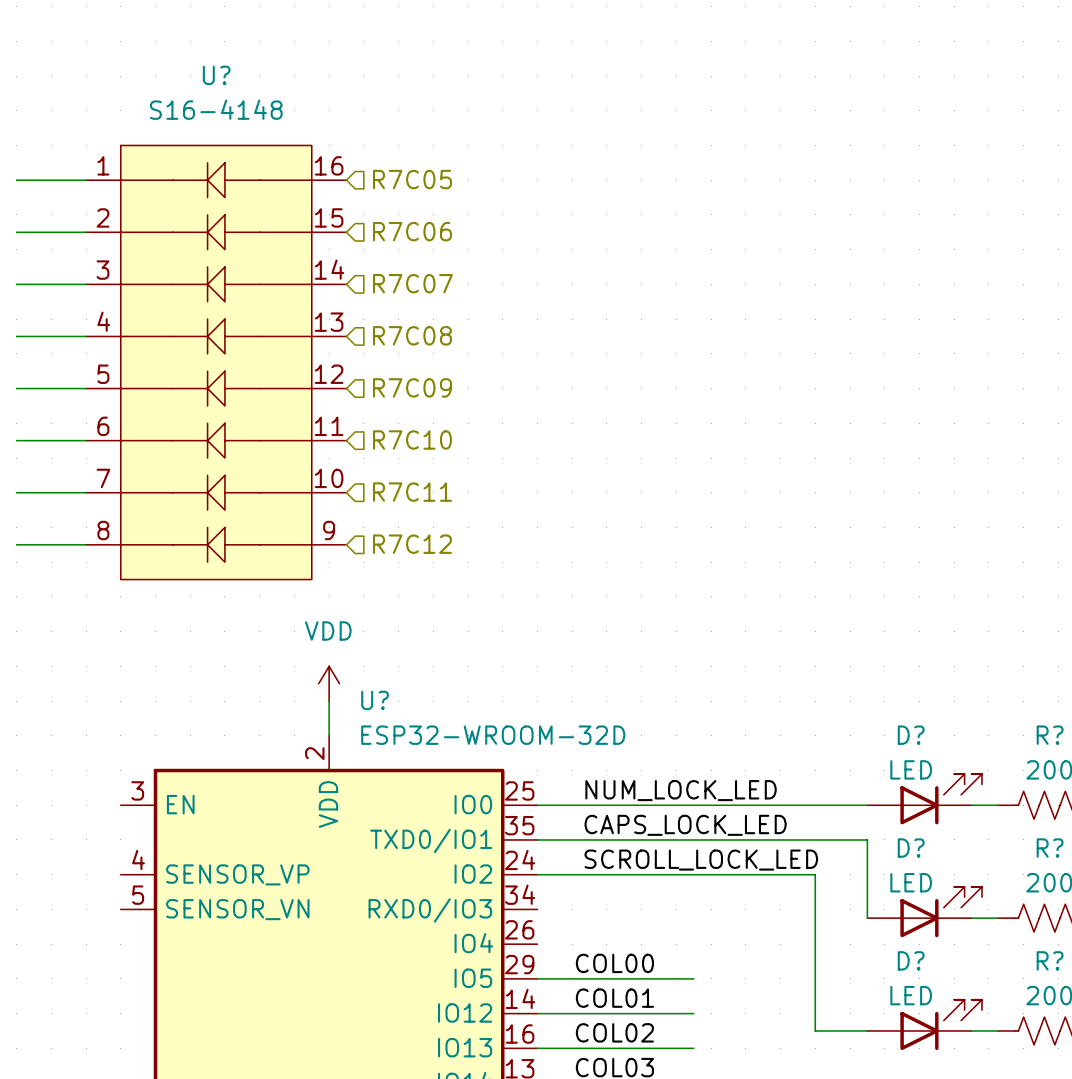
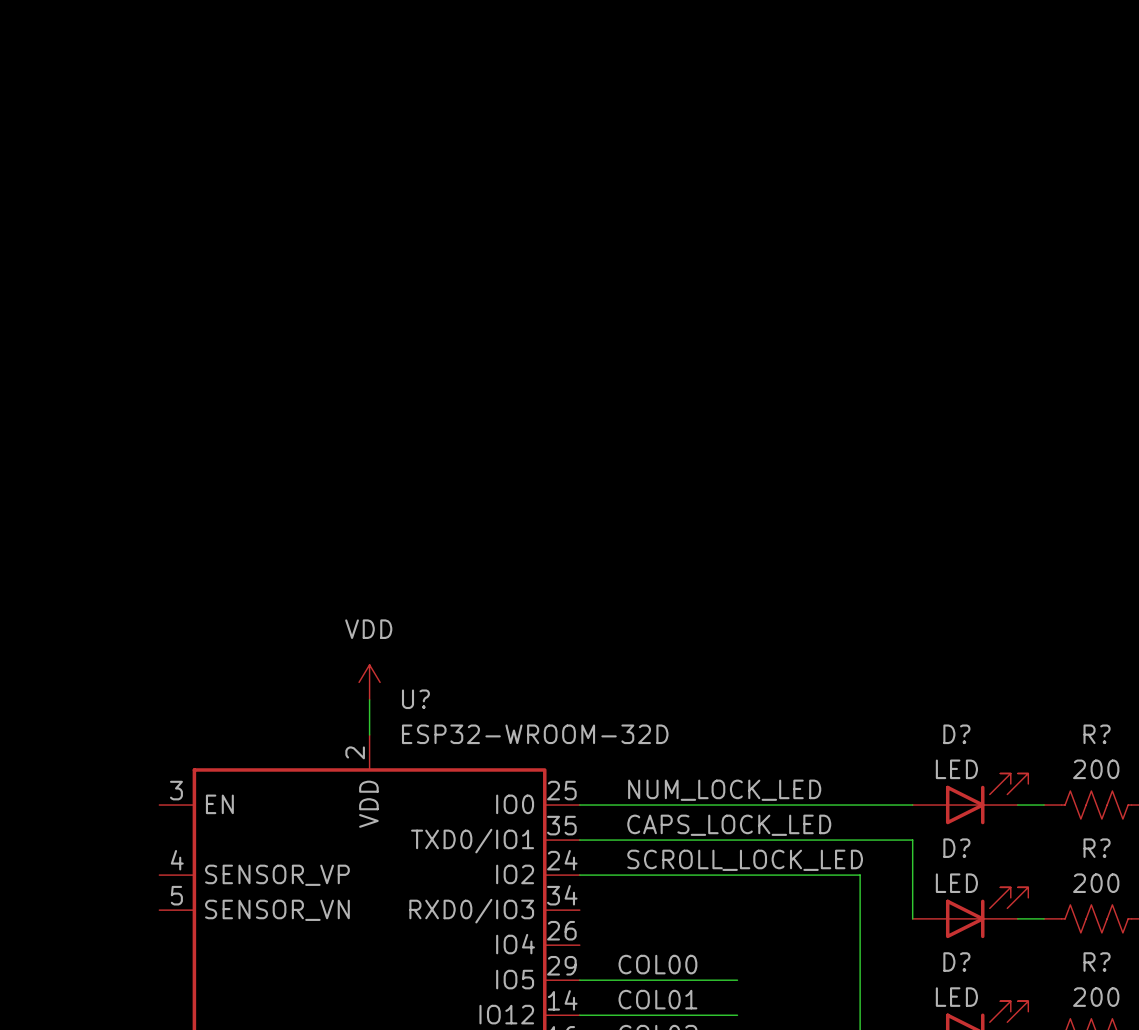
hierarchical label: R7C05 (412, 179) -> none
wire: (16, 180) (86, 180) -> none
hierarchical label: R7C06 (412, 231) -> none
wire: (16, 232) (86, 232) -> none
hierarchical label: R7C07 (412, 283) -> none
wire: (16, 284) (86, 284) -> none
hierarchical label: R7C08 (412, 335) -> none
wire: (16, 336) (86, 336) -> none
U?: S16-4148 (216, 362) -> none
hierarchical label: R7C09 (412, 387) -> none
wire: (16, 388) (86, 388) -> none
hierarchical label: R7C10 (412, 439) -> none
wire: (16, 440) (86, 440) -> none
wire: (16, 492) (86, 492) -> none
hierarchical label: R7C11 (412, 492) -> none
wire: (16, 544) (86, 544) -> none
hierarchical label: R7C12 (412, 544) -> none

